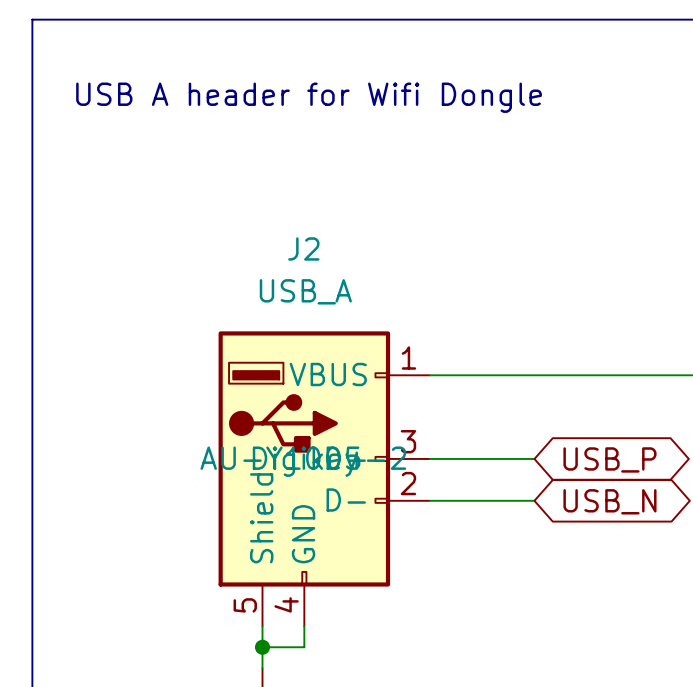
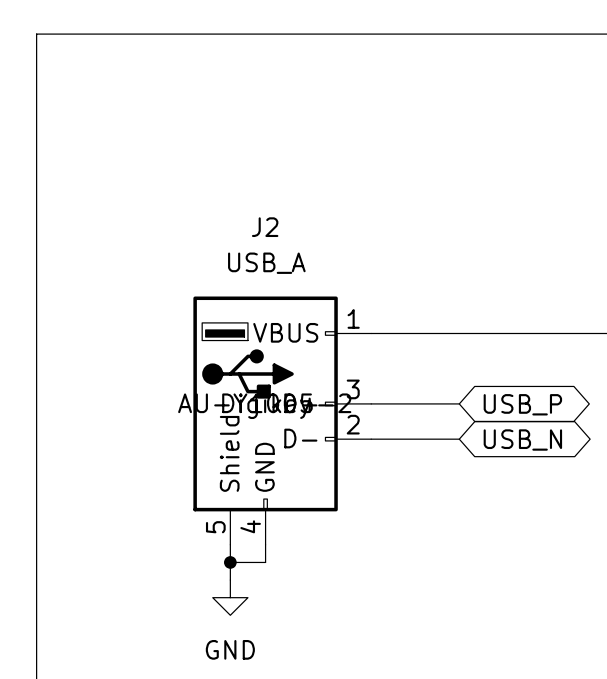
text: USB A header for Wifi Dongle (309, 97) -> none

